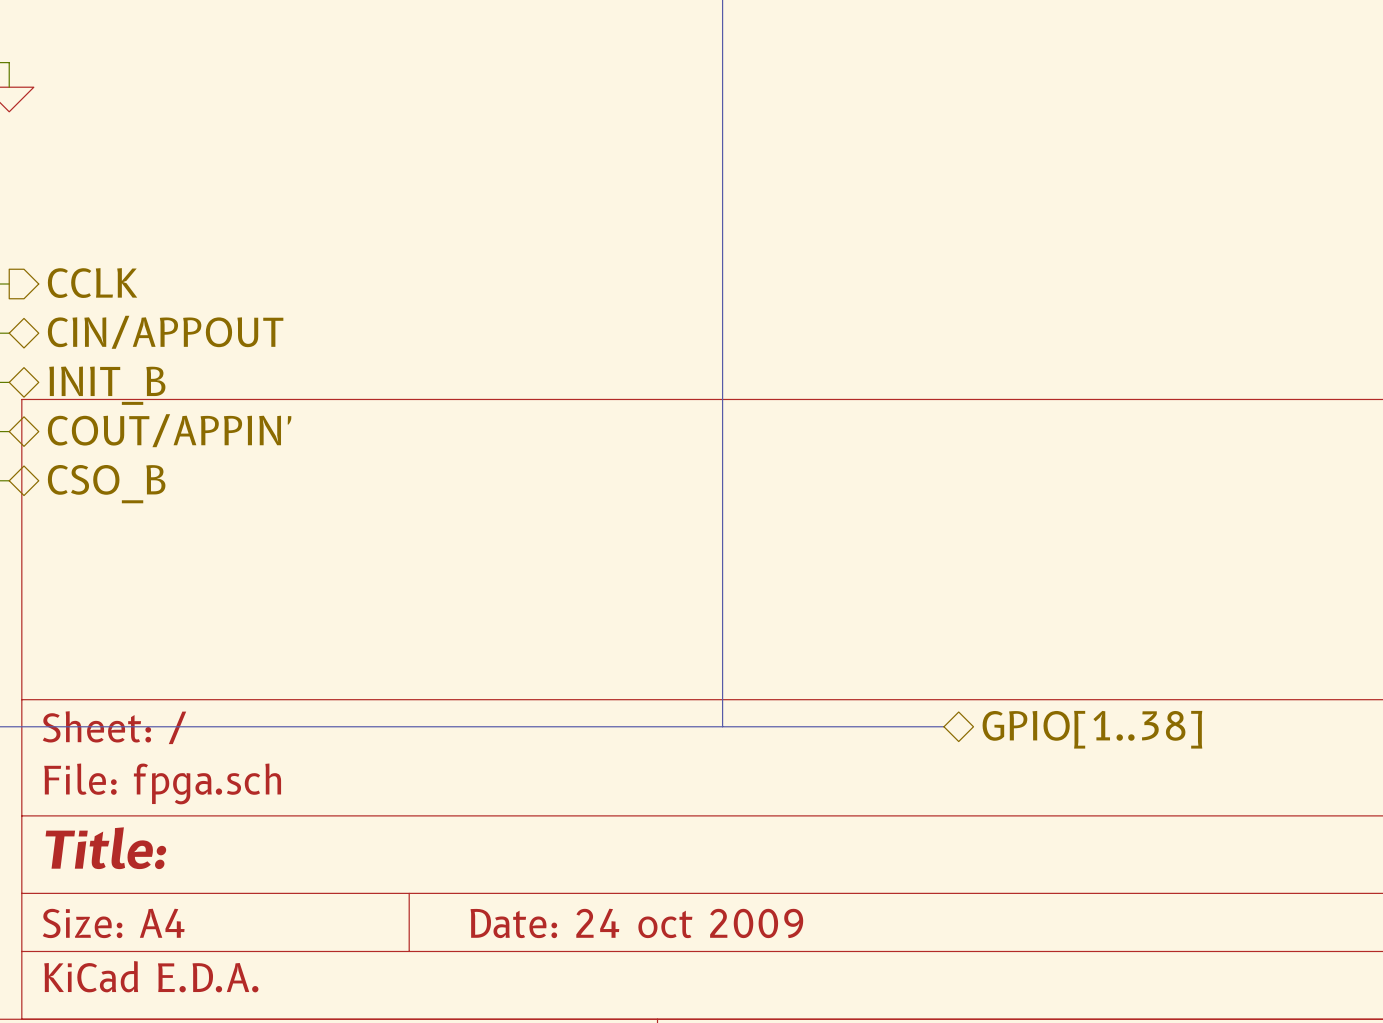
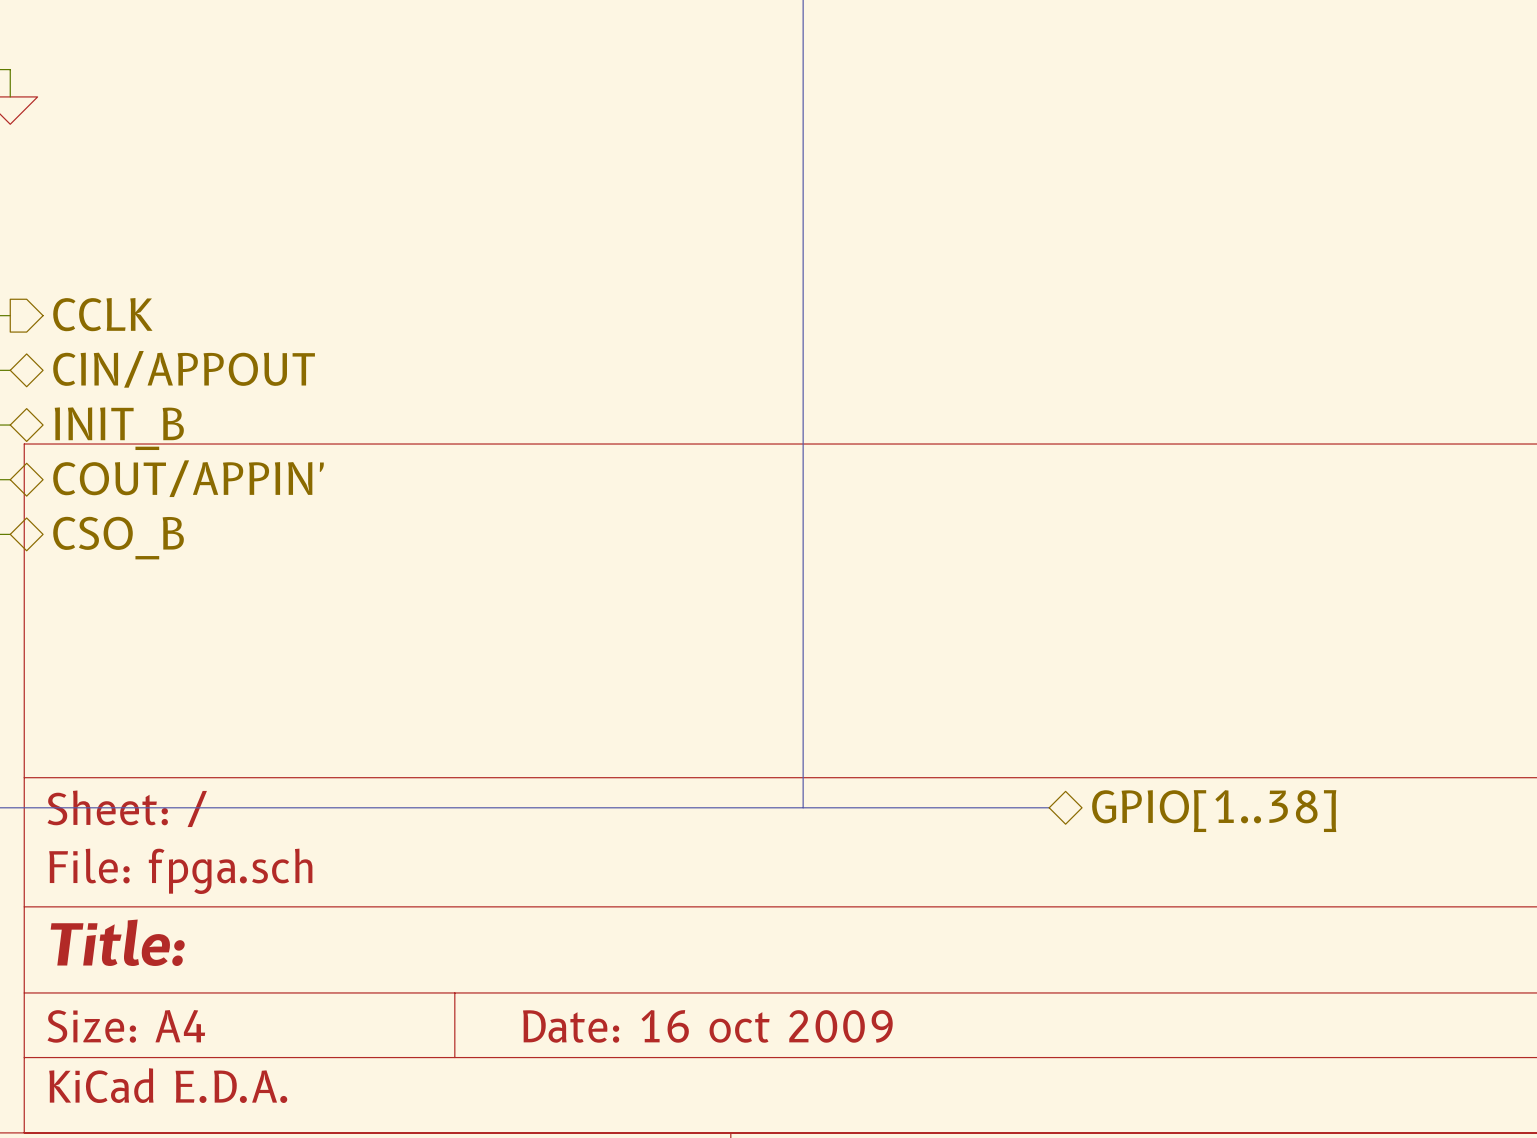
title block: Date: 24 oct 2009 (636, 923) -> Date: 16 oct 2009 (707, 1026)

